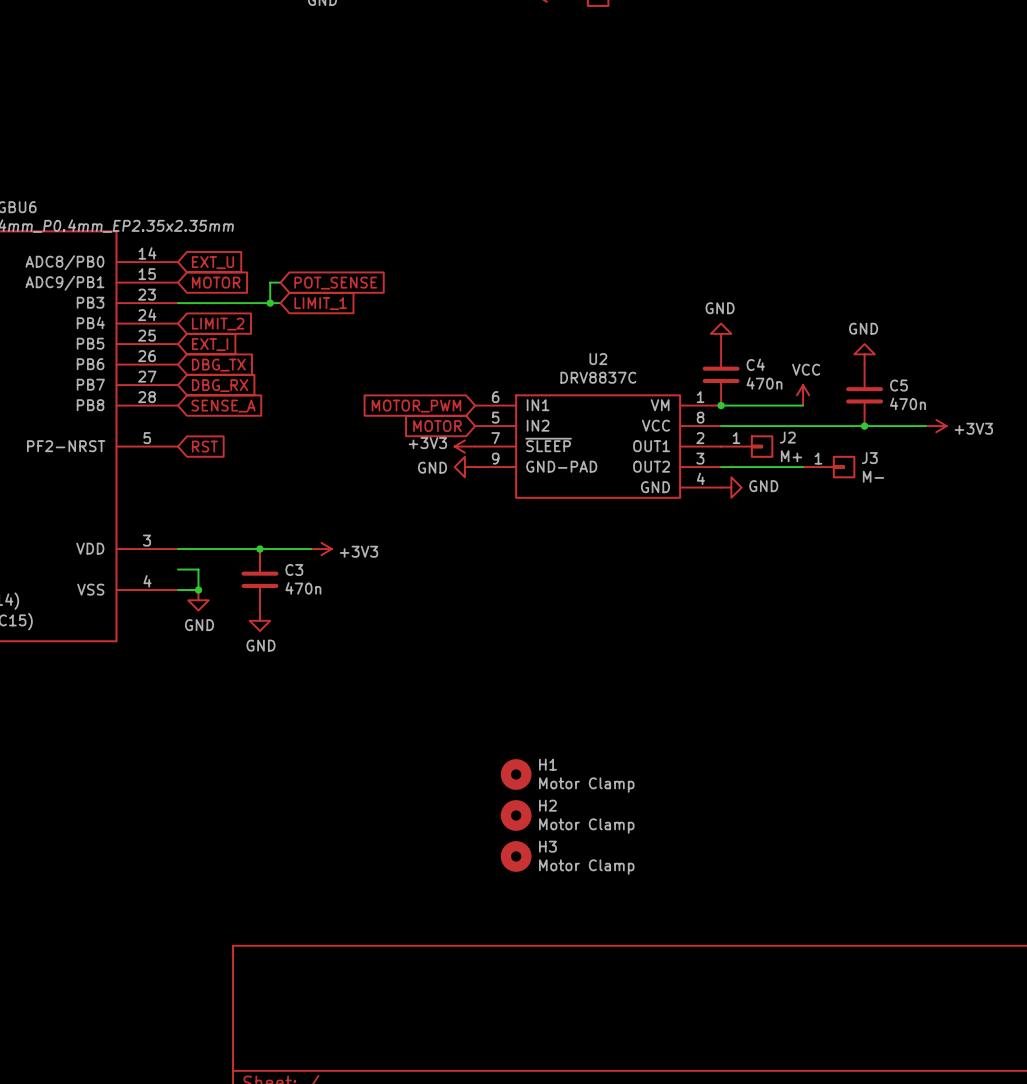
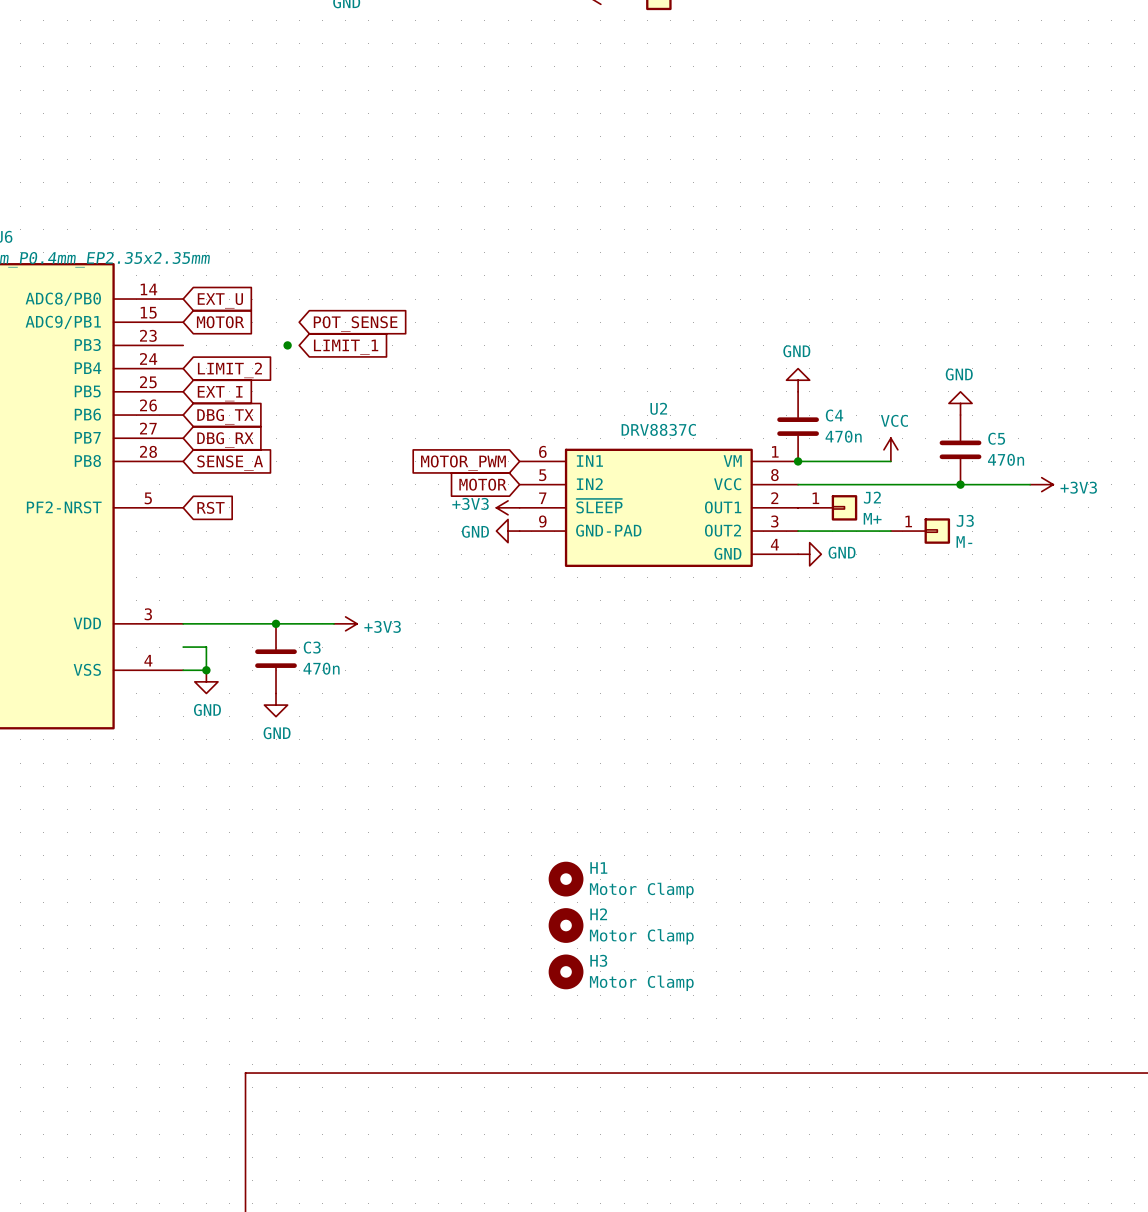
wire: (280, 282) (270, 282) (270, 303) -> none
wire: (177, 303) (280, 303) -> none

